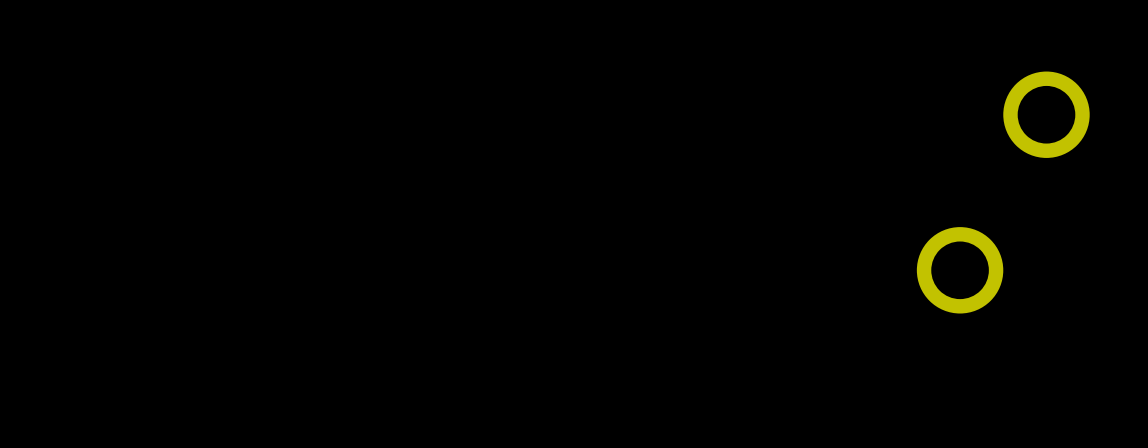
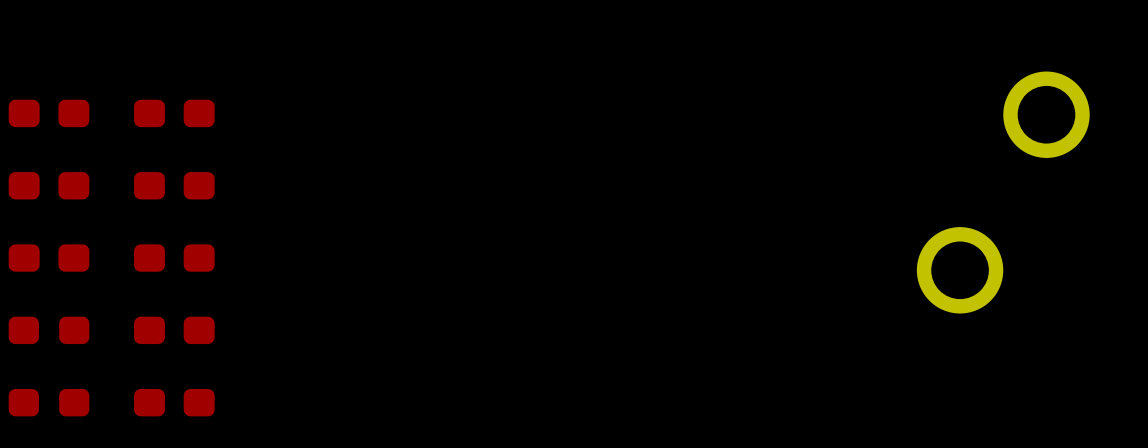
part: none -> (49, 113)
part: none -> (174, 113)
part: none -> (49, 185)
part: none -> (174, 185)
part: none -> (49, 258)
part: none -> (174, 258)
part: none -> (49, 330)
part: none -> (174, 330)
part: none -> (49, 402)
part: none -> (174, 402)

